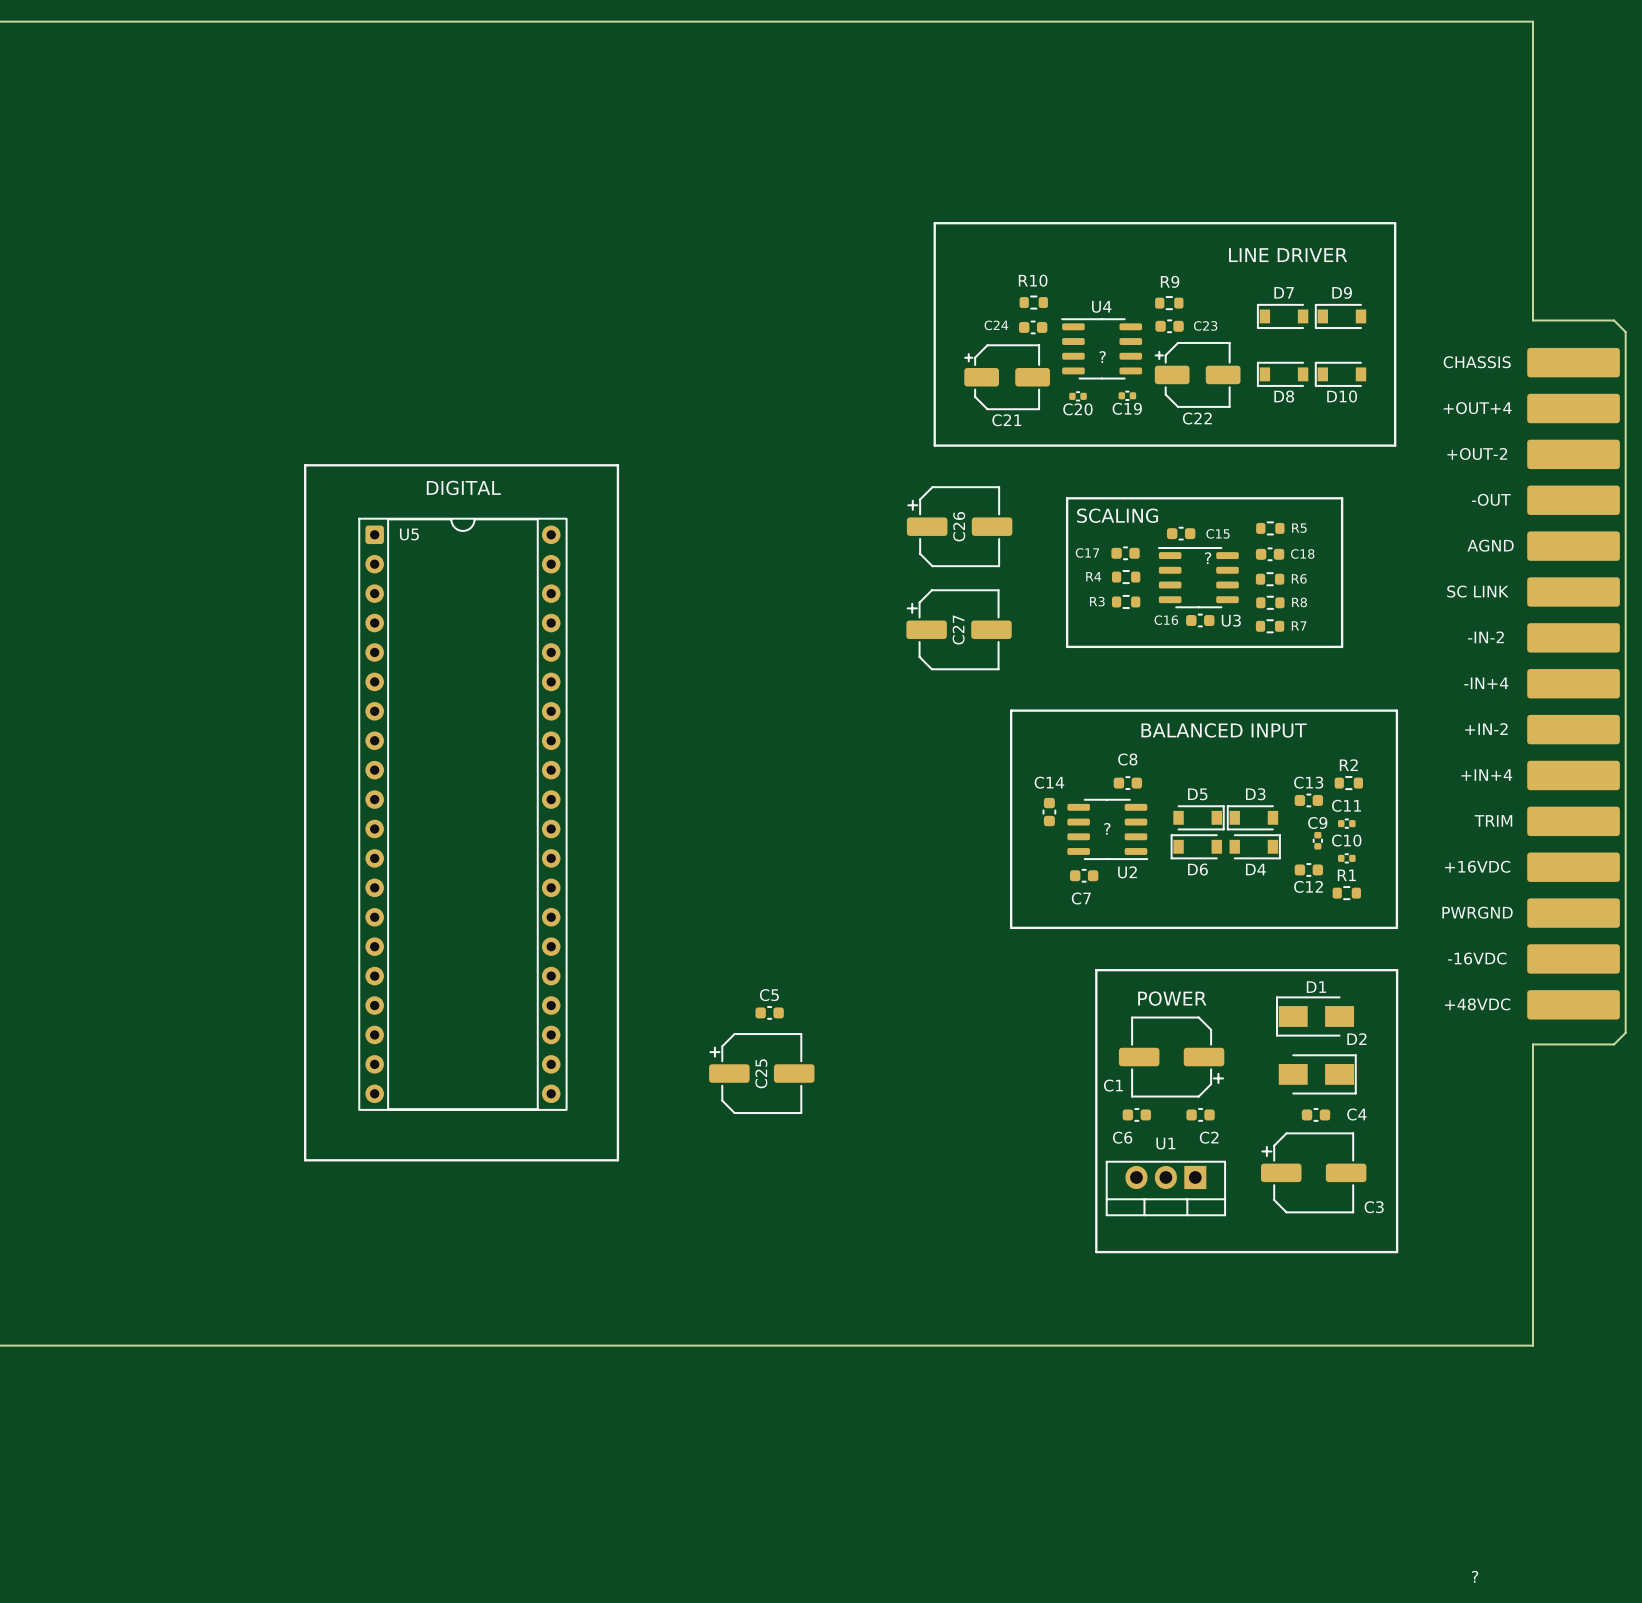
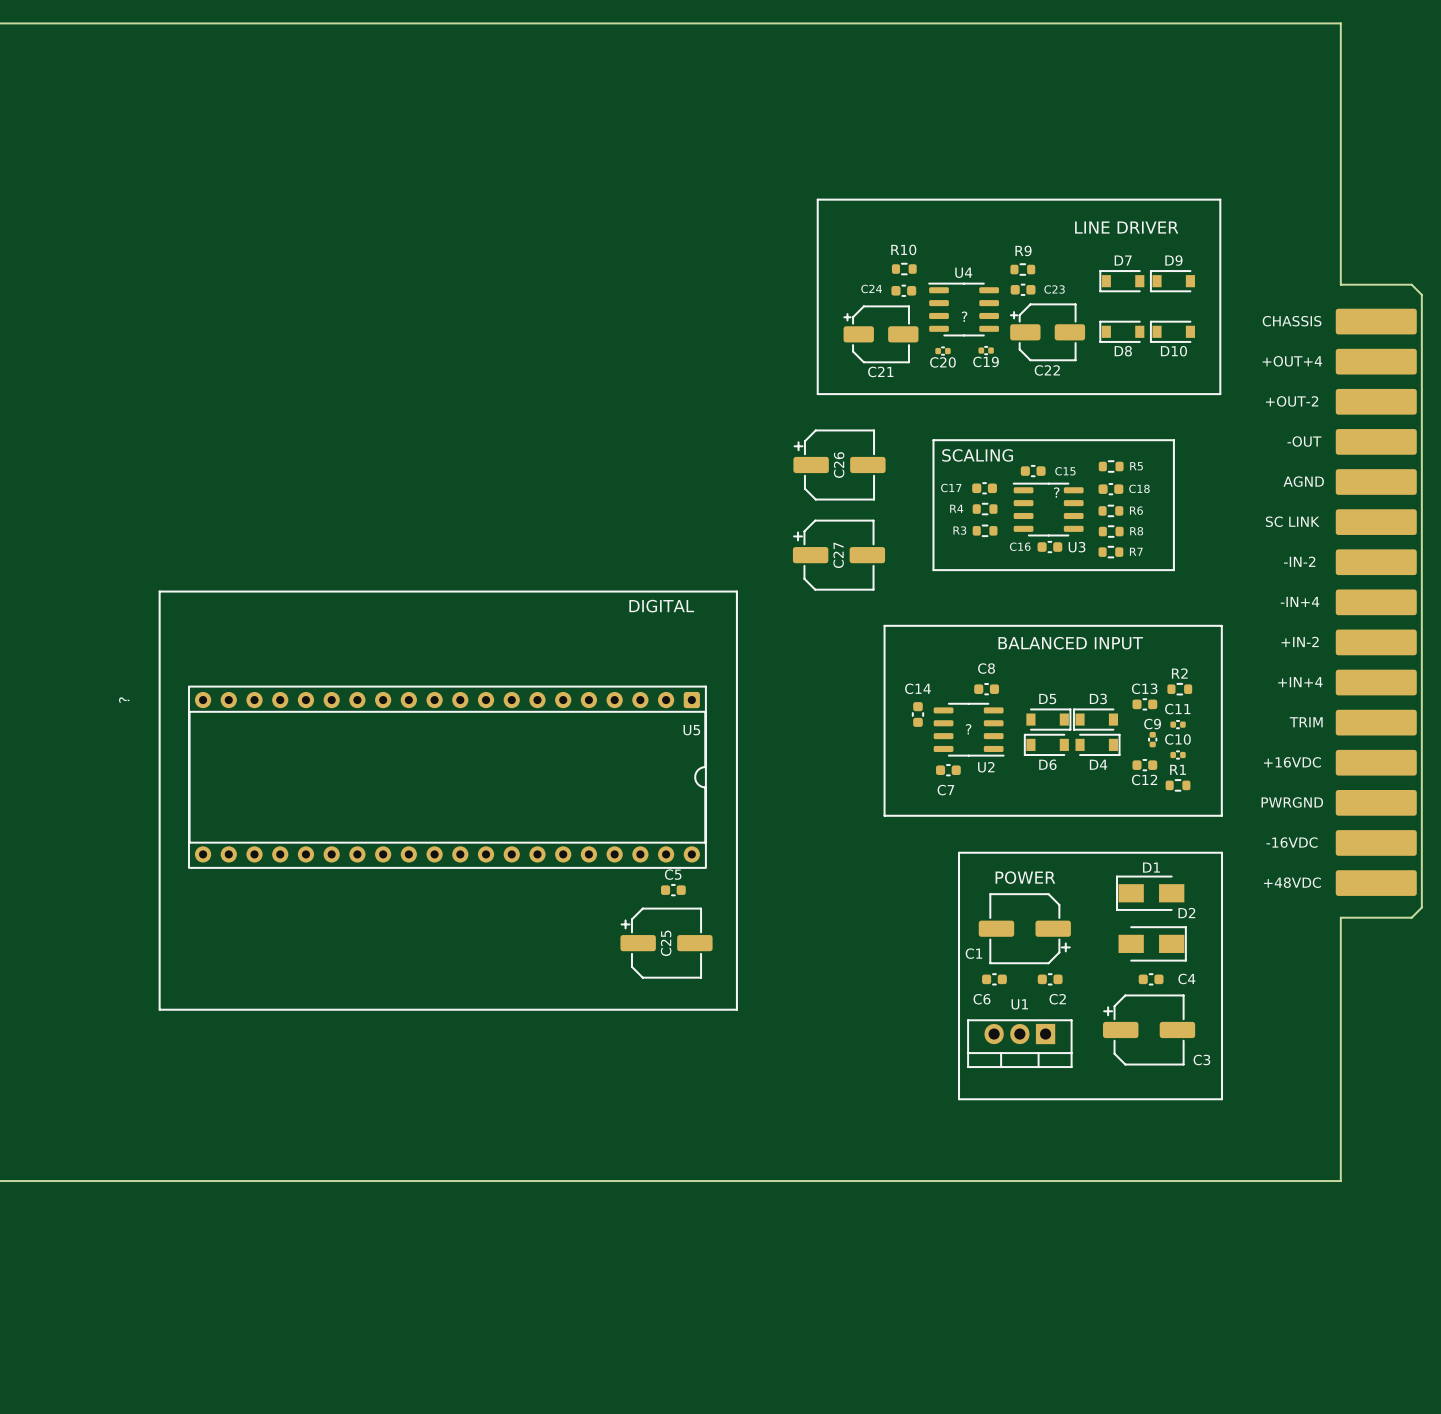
line: (305, 465) (617, 465) (617, 1160) (305, 1160) (305, 465) -> none
text: DIGITAL (463, 487) -> none
line: none -> (159, 591) (736, 591) (736, 1009) (159, 1009) (159, 591)
text: none -> DIGITAL (661, 606)
U5 rotation: 0° (462, 814) -> 90° clockwise (447, 777)
U5 value position: ? (1475, 1576) -> ? (124, 700)

